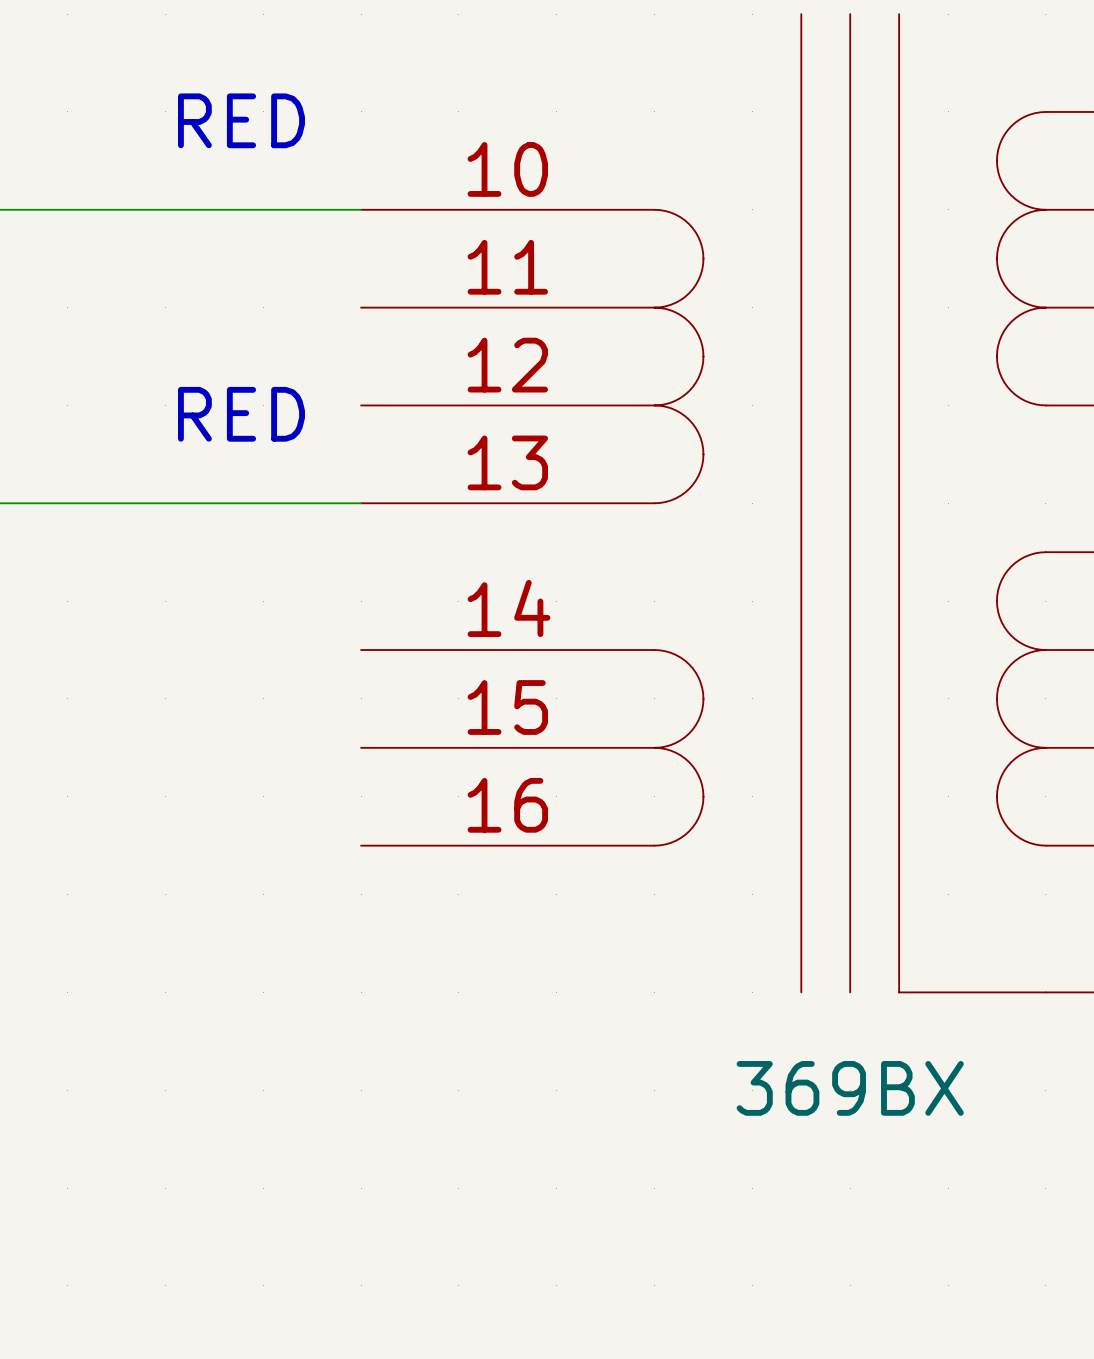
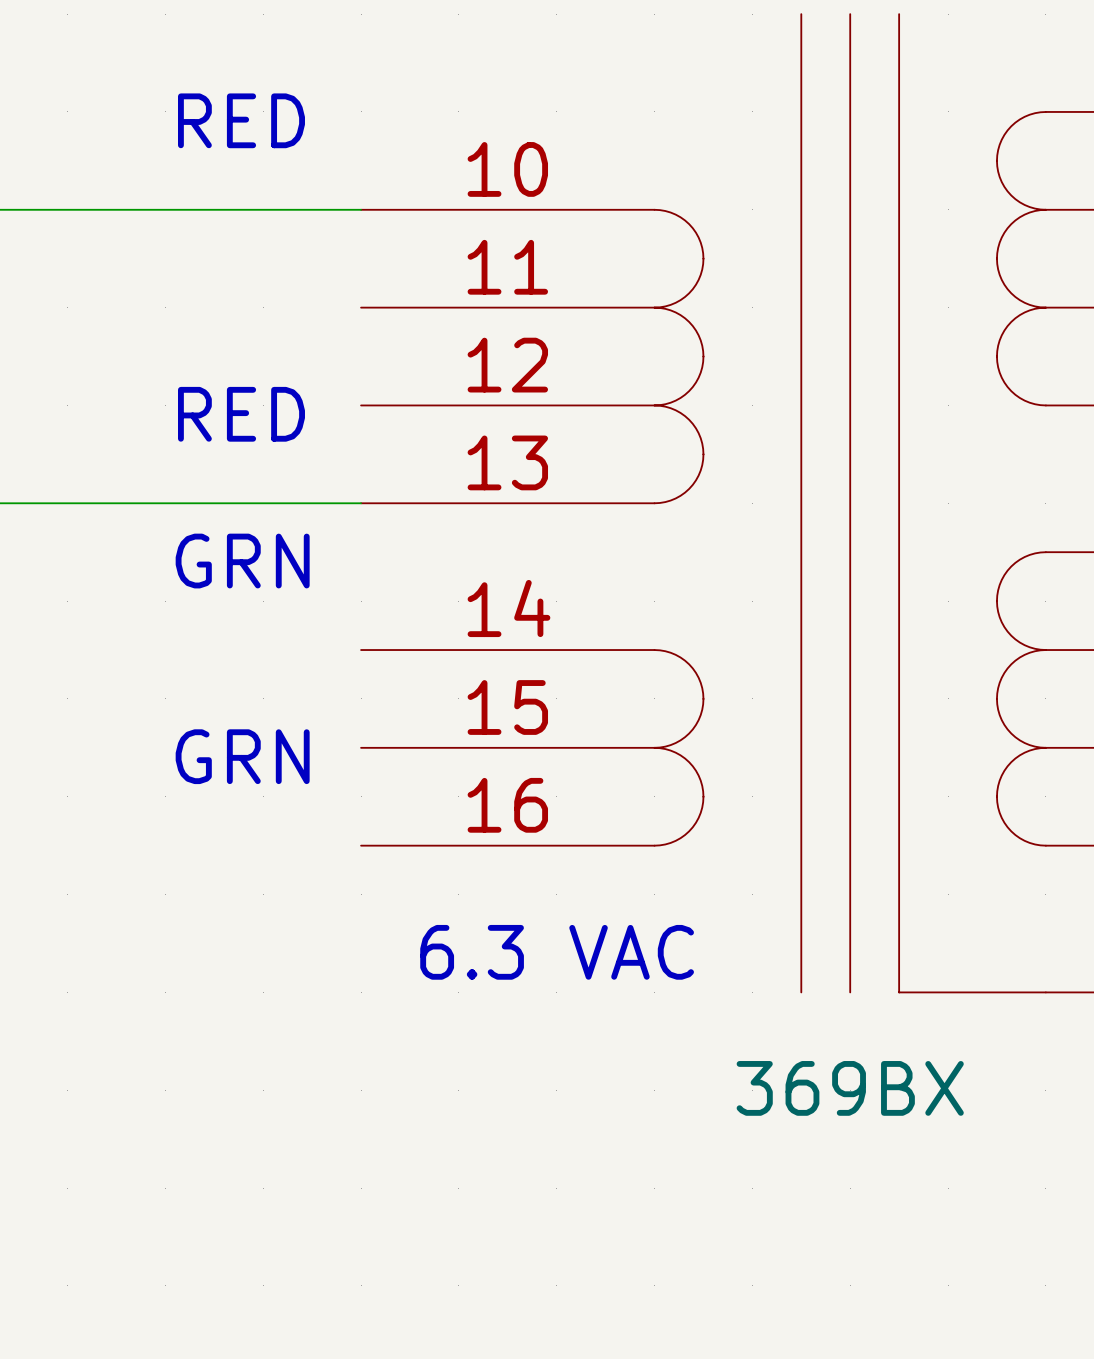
text: none -> GRN (242, 561)
text: none -> GRN (242, 756)
text: none -> 6.3 VAC (557, 952)

